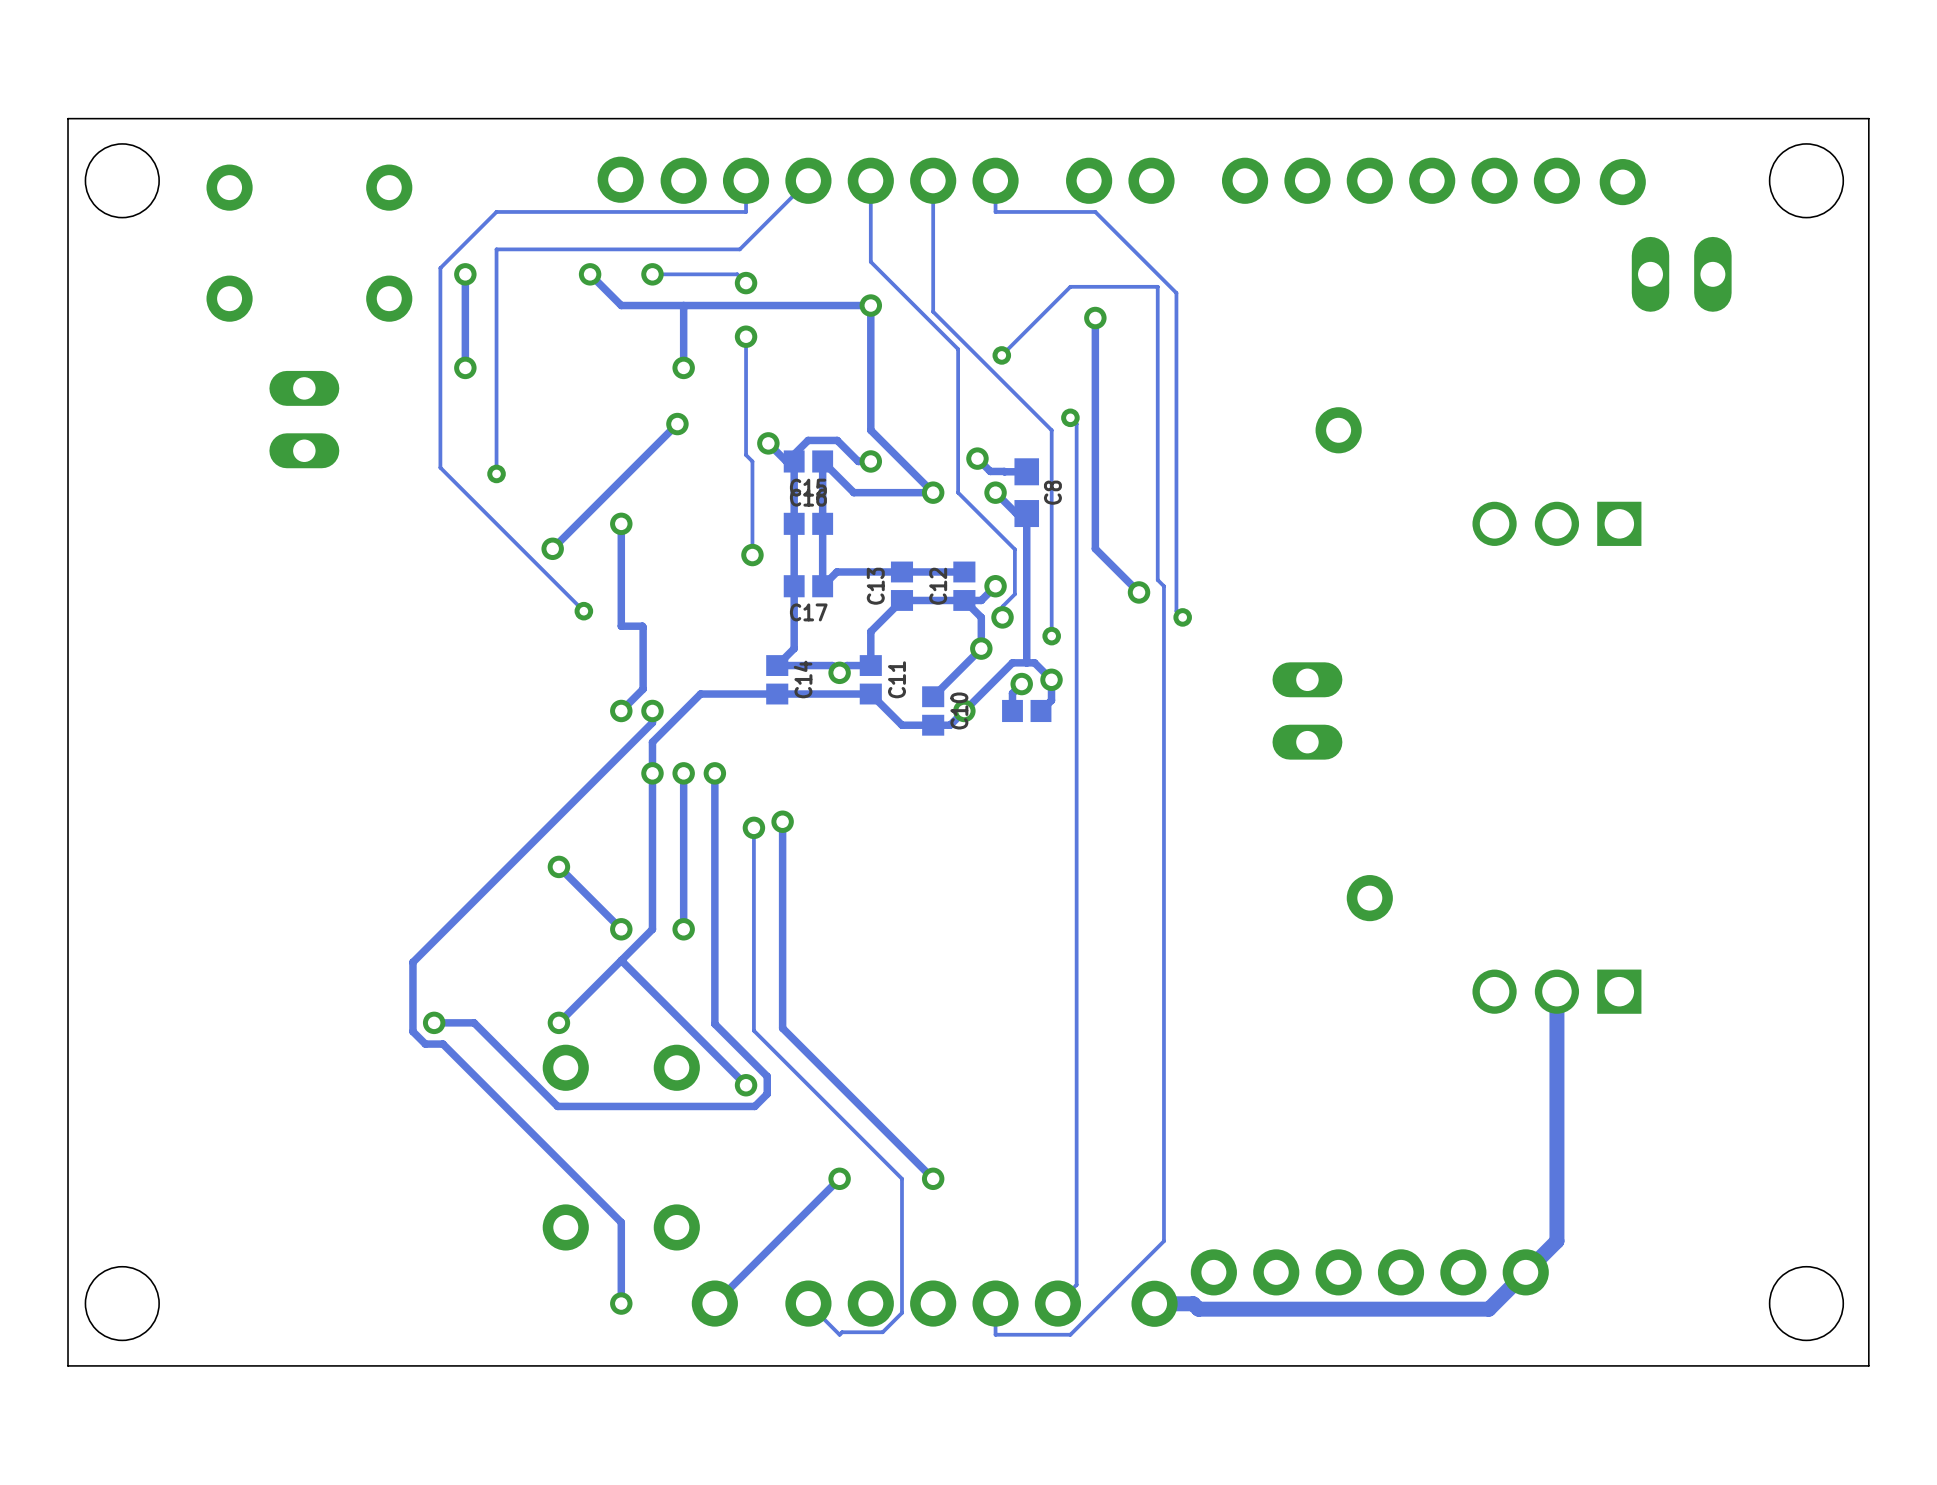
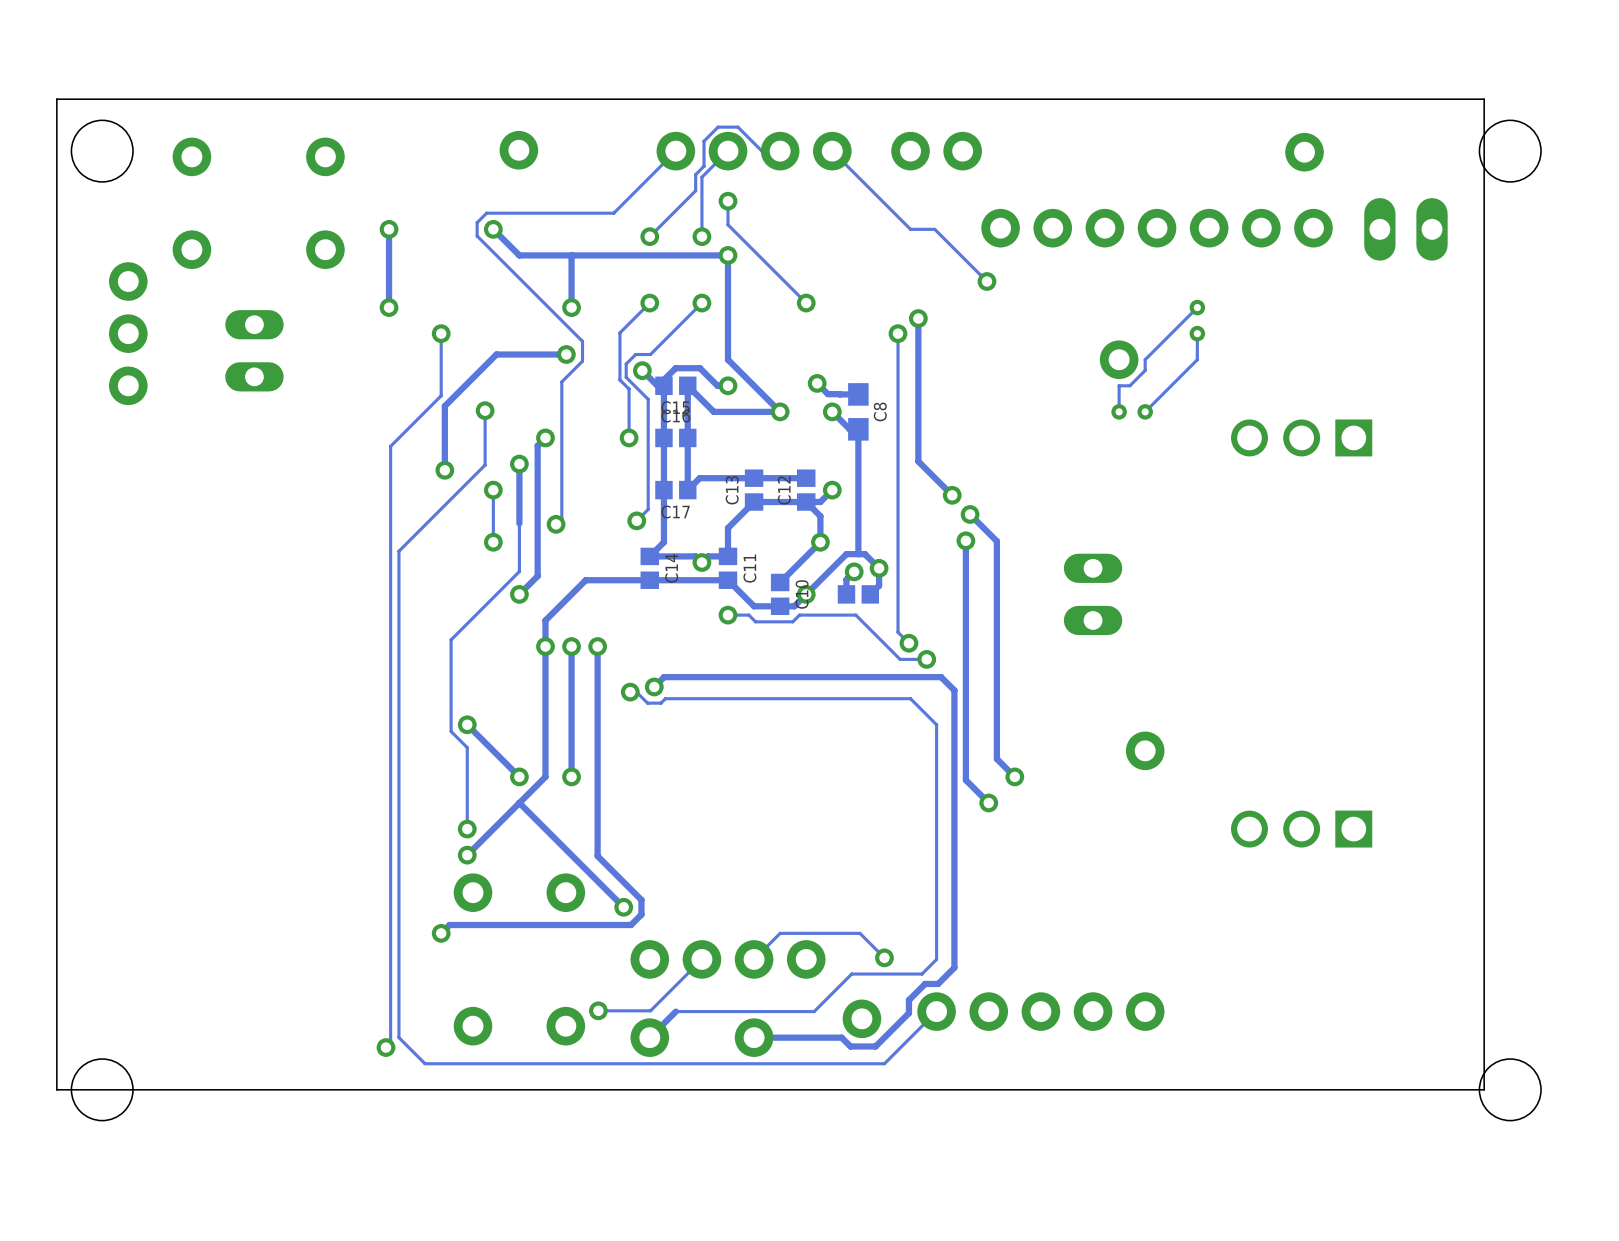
board edge: (1775, 118) (1868, 118) (1868, 1365) (68, 1365) (68, 1303) -> (1484, 99) (1484, 1089) (56, 1089)
track: (746, 180) (746, 211) (496, 211) (440, 268) (440, 467) (583, 611) -> none
part: (839, 180) -> none
track: (870, 180) (870, 240) -> (728, 151) (701, 177) (701, 236)
part: none -> (754, 151)
track: (933, 180) (933, 311) (1051, 430) (1051, 636) -> (780, 151) (761, 151) (737, 127) (718, 127) (704, 141) (704, 166) (695, 174) (695, 190) (649, 236)
track: (995, 180) (995, 211) (1095, 211) (1176, 293) (1176, 611) (1182, 617) -> (832, 151) (910, 229) (934, 229) (986, 281)
part: (1401, 180) -> none
part position: (1622, 182) -> (1304, 152)
via: none -> (728, 201)
track: (739, 249) (496, 249) (496, 473) -> (618, 208) (613, 213) (486, 213) (477, 222) (477, 236) (582, 341) (582, 361) (561, 381) (561, 518) (556, 524)
track: (870, 261) (958, 349) (958, 492) (1014, 549) (1014, 594) (1002, 606) (1002, 617) -> (728, 218) (728, 224) (806, 303)
part: none -> (1157, 228)
track: (652, 274) (737, 274) (746, 283) -> none
via: (652, 274) -> none
via: (746, 283) -> none
via: none -> (649, 236)
via: none -> (701, 236)
track: (1095, 318) (1095, 548) (1098, 551) -> (918, 318) (918, 461)
via: (1095, 318) -> none
track: (746, 336) (746, 455) (752, 461) (752, 465) -> (649, 303) (619, 332) (619, 379) (629, 389)
via: (746, 336) -> none
via: none -> (986, 281)
track: (1001, 355) (1070, 286) (1157, 286) (1157, 579) (1163, 586) (1163, 1241) (1070, 1334) (995, 1334) (995, 1303) -> none
via: (1001, 355) -> none
via: none -> (649, 303)
track: none -> (701, 303) (650, 354) (635, 354) (626, 363) (626, 377) (648, 399) (648, 509) (636, 520)
via: none -> (701, 303)
via: none -> (806, 303)
track: none -> (1197, 307) (1145, 359) (1145, 370) (1129, 385) (1119, 385) (1119, 411)
via: none -> (1197, 307)
via: none -> (918, 318)
part: none -> (128, 333)
track: none -> (441, 333) (441, 395) (390, 446) (390, 1042) (386, 1047)
via: none -> (441, 333)
track: none -> (898, 333) (898, 632) (908, 643)
track: none -> (1197, 333) (1197, 359) (1145, 411)
via: none -> (1197, 333)
track: (1070, 417) (1076, 424) (1076, 1284) (1057, 1303) -> none
via position: (1070, 417) -> (898, 333)
track: (677, 424) (552, 548) -> (566, 354) (496, 354) (444, 406) (444, 470)
via: (496, 473) -> none
track: none -> (485, 410) (485, 465) (398, 551) (398, 1037) (425, 1063) (884, 1063) (936, 1011)
via: none -> (485, 410)
via: none -> (1119, 411)
via: none -> (1145, 411)
track: (621, 523) (621, 555) -> none
via: (621, 523) -> none
via: none -> (545, 437)
track: (752, 523) (752, 555) -> none
via position: (552, 548) -> (444, 470)
via: none -> (519, 464)
via position: (752, 555) -> (629, 437)
track: none -> (493, 490) (493, 542)
via: none -> (493, 490)
via: (583, 611) -> none
track: none -> (970, 514) (996, 541) (996, 758) (1014, 776)
via: none -> (970, 514)
via: (1002, 617) -> none
via: (1182, 617) -> none
via: none -> (636, 520)
track: (621, 626) (643, 627) -> (545, 437) (537, 445) (537, 524)
track: none -> (519, 523) (519, 571) (451, 639) (451, 731) (467, 747) (467, 829)
via: none -> (556, 524)
via: (1051, 636) -> none
track: none -> (965, 540) (965, 780) (988, 802)
via: none -> (965, 540)
via: none -> (493, 542)
track: (652, 710) (652, 722) (412, 962) (412, 1031) (425, 1044) (442, 1044) (621, 1222) (621, 1303) -> none
via: (652, 710) -> none
track: none -> (728, 615) (748, 615) (755, 621) (792, 621) (799, 615) (855, 615) (900, 659) (926, 659)
via: none -> (728, 615)
via: none -> (908, 643)
via: none -> (926, 659)
track: (782, 821) (782, 1028) (933, 1178) -> (654, 686) (664, 677) (941, 677) (954, 690) (954, 967) (938, 983) (925, 983) (908, 1000) (908, 1013) (875, 1046) (850, 1046) (841, 1037) (754, 1037)
track: (753, 827) (753, 1030) (901, 1178) (901, 1312) (882, 1332) (842, 1332) (839, 1334) (808, 1303) -> none
via: none -> (1014, 776)
via: none -> (988, 802)
via: none -> (467, 829)
track: (1556, 991) (1556, 1241) (1488, 1309) (1198, 1309) (1193, 1303) (1154, 1303) -> none
track: (434, 1022) (474, 1022) (557, 1106) -> (441, 933) (449, 925) (466, 925)
via: (434, 1022) -> none
via: none -> (441, 933)
track: none -> (884, 957) (859, 933) (780, 933) (754, 959)
via: none -> (884, 957)
part: none -> (649, 959)
track: none -> (701, 959) (650, 1010) (598, 1010)
part: none -> (754, 959)
track: (839, 1178) (808, 1209) -> (630, 686) (647, 703) (660, 703) (665, 698) (910, 698) (936, 724) (936, 959) (922, 974) (851, 974) (814, 1011) (675, 1011)
via: (839, 1178) -> none
via: (933, 1178) -> none
via: none -> (598, 1010)
part: none -> (861, 1018)
track: (777, 1241) (714, 1303) -> none
part: none -> (649, 1037)
part: none -> (754, 1037)
via: none -> (386, 1047)
part: (1369, 1272) -> none
via: (621, 1303) -> none
part: (714, 1303) -> none
part position: (933, 1303) -> (1040, 1011)
part: (1154, 1303) -> none

